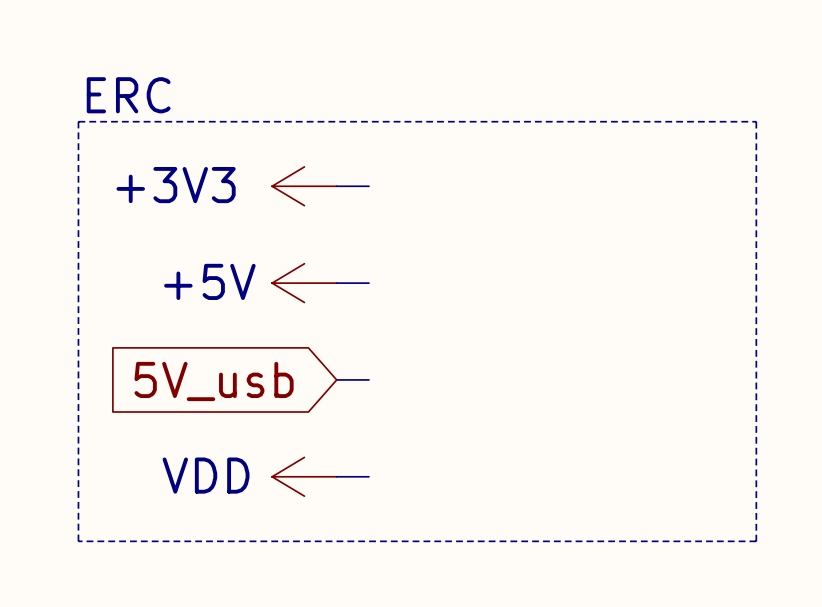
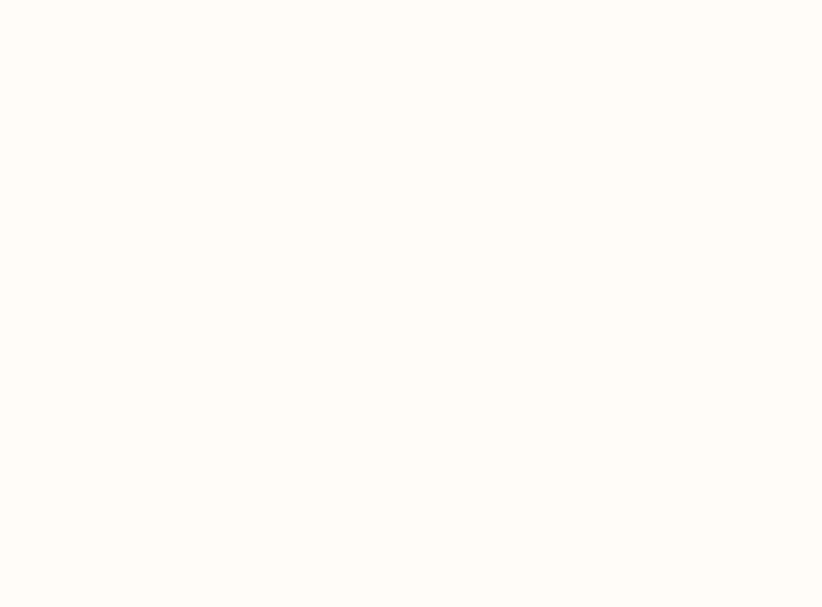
text: ERC (128, 95) -> none
line: (78, 121) (756, 121) (756, 541) (78, 541) (78, 121) -> none
power symbol: +3V3 (304, 186) -> none
wire: (336, 186) (368, 186) -> none
power symbol: +5V (304, 283) -> none
wire: (336, 283) (368, 283) -> none
wire: (336, 379) (368, 379) -> none
global label: 5V_usb (214, 381) -> none
power symbol: VDD (304, 476) -> none
wire: (336, 476) (368, 476) -> none

